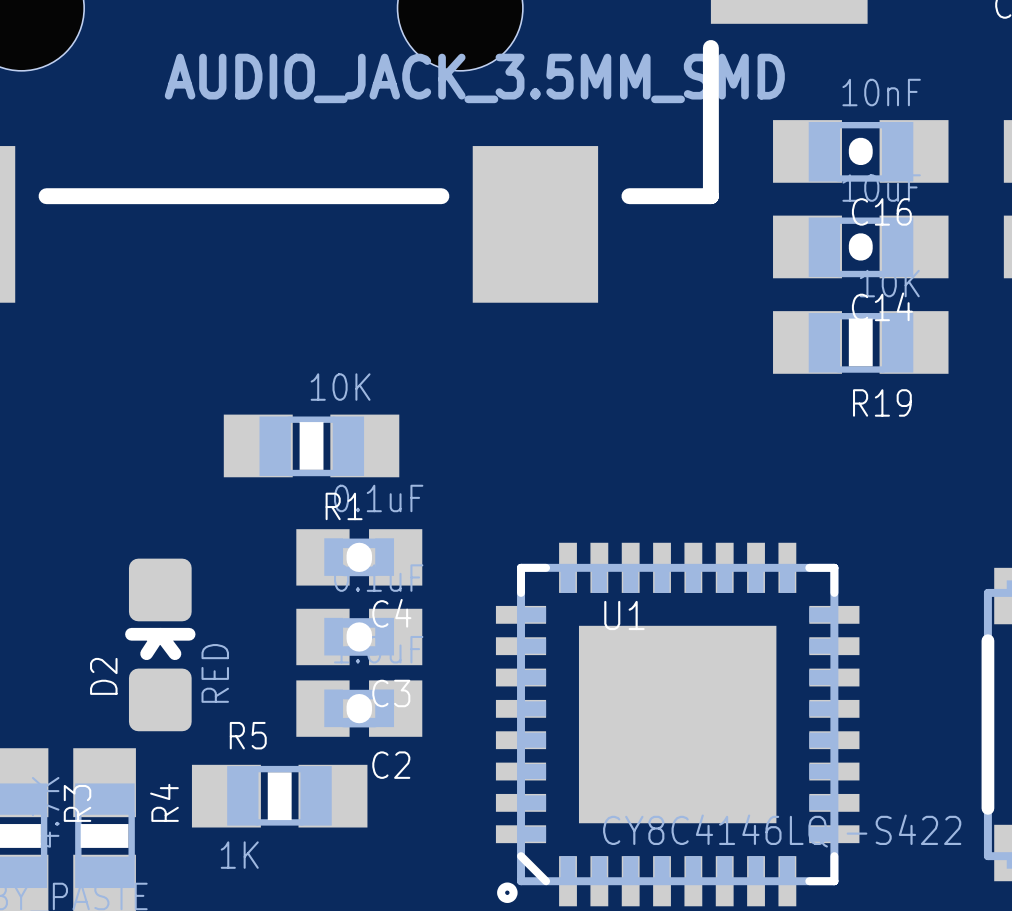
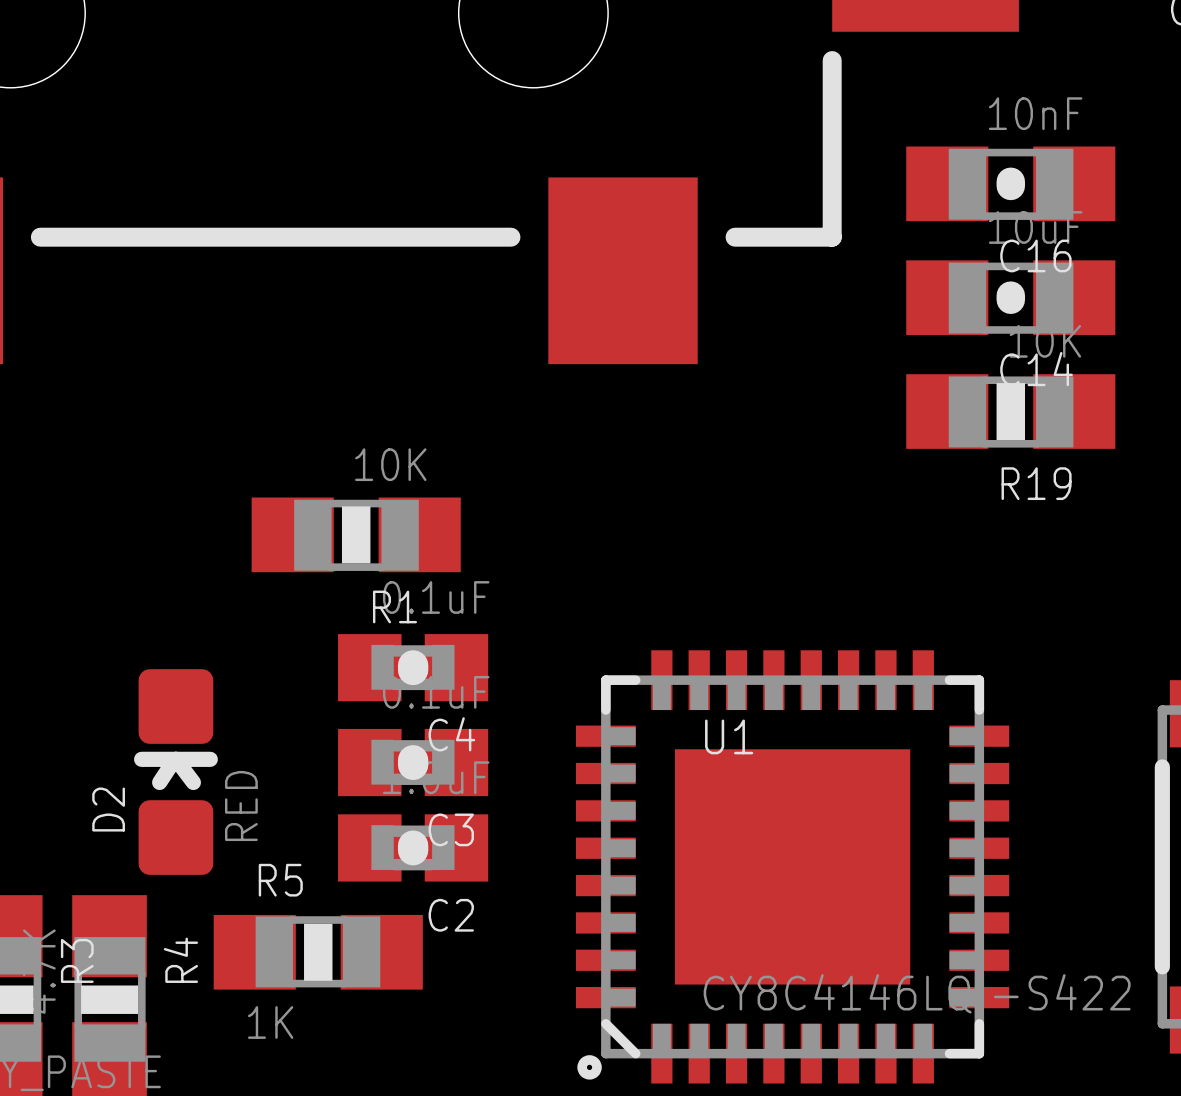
part value: AUDIO_JACK_3.5MM_SMD (474, 78) -> none

